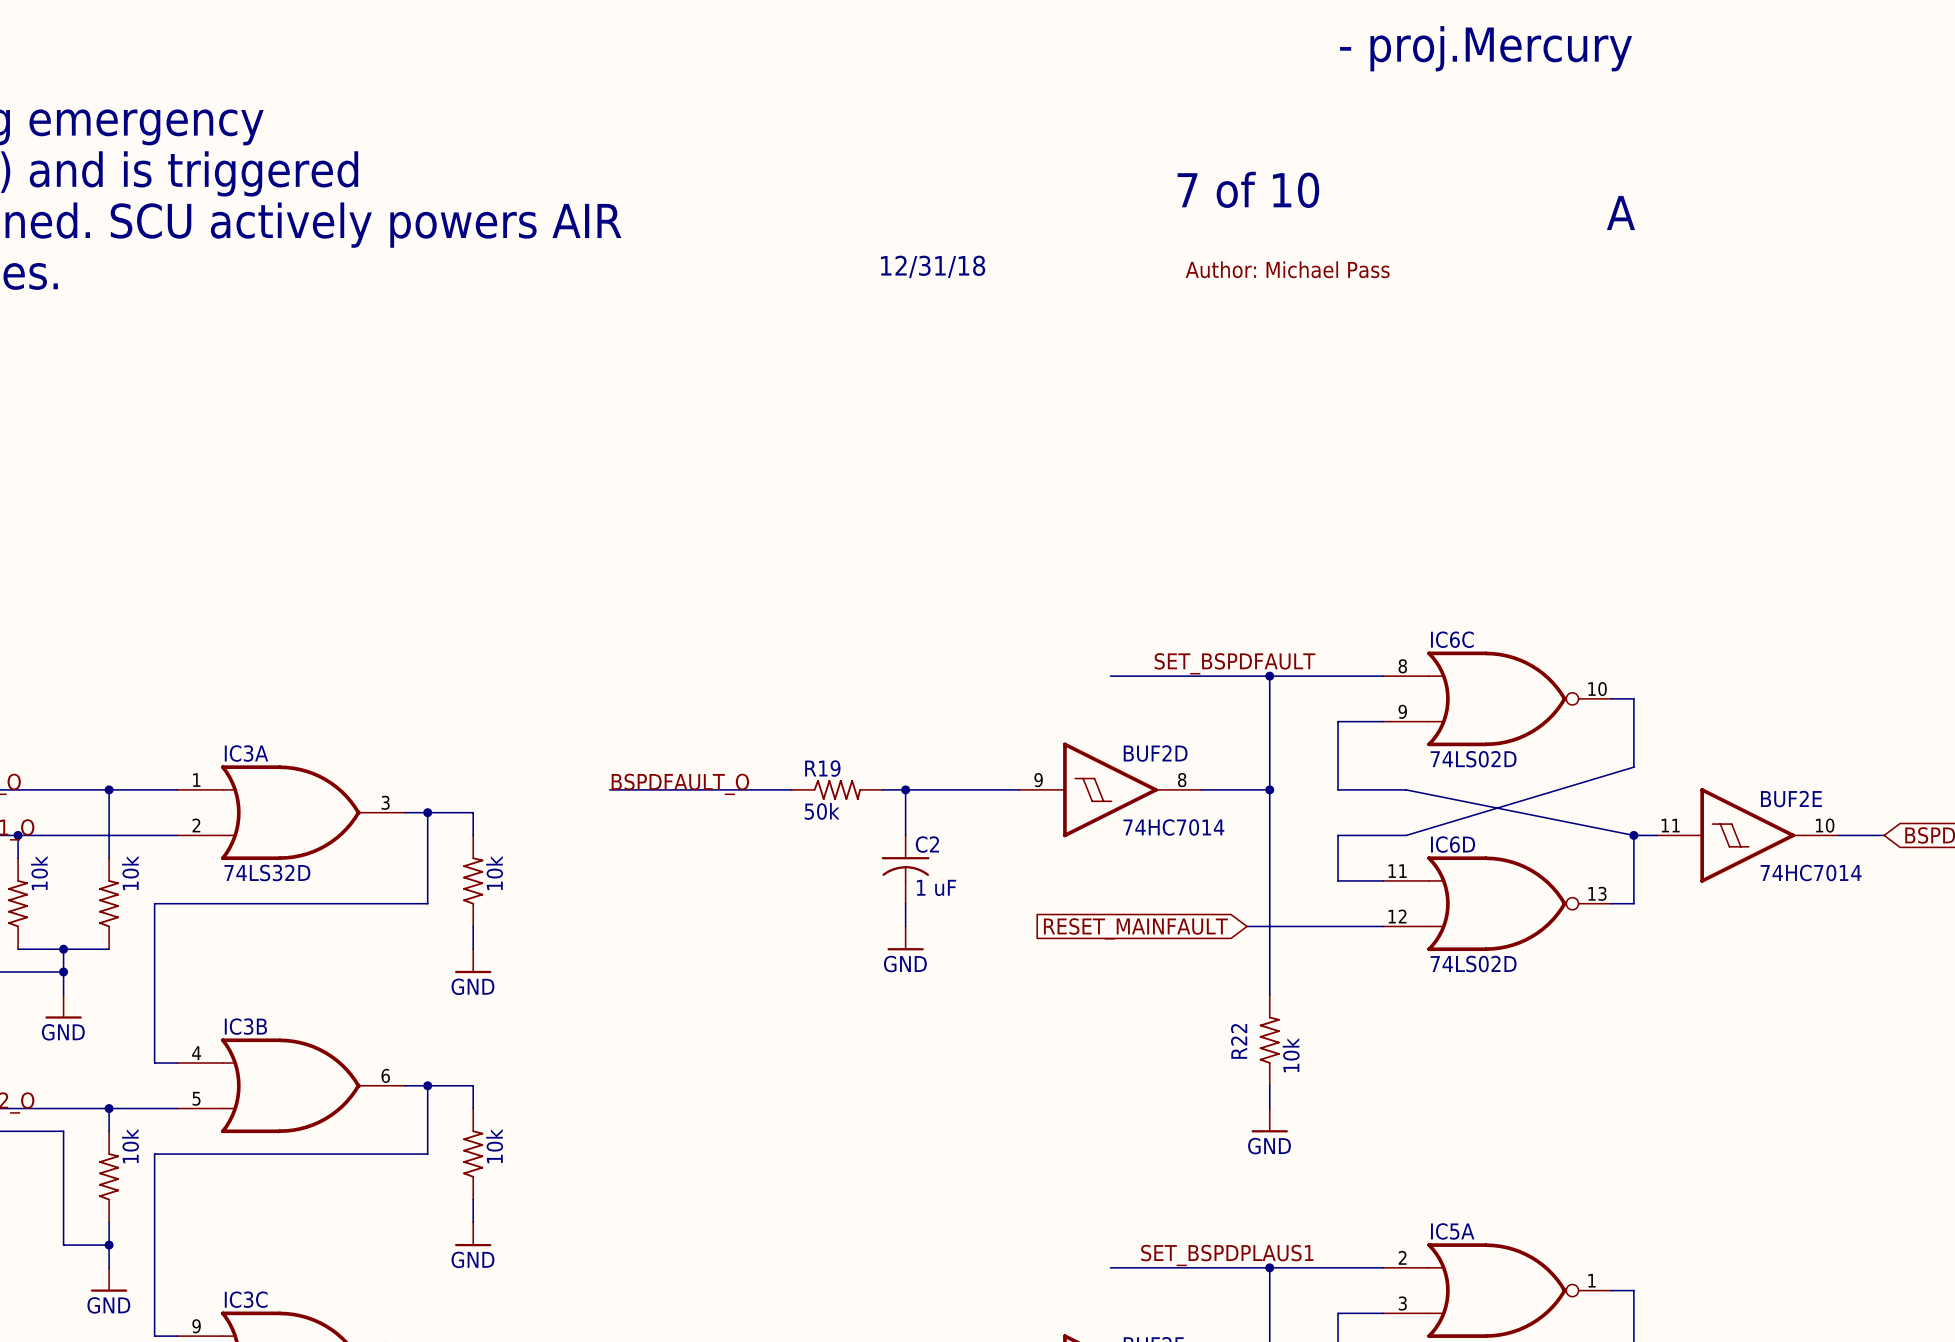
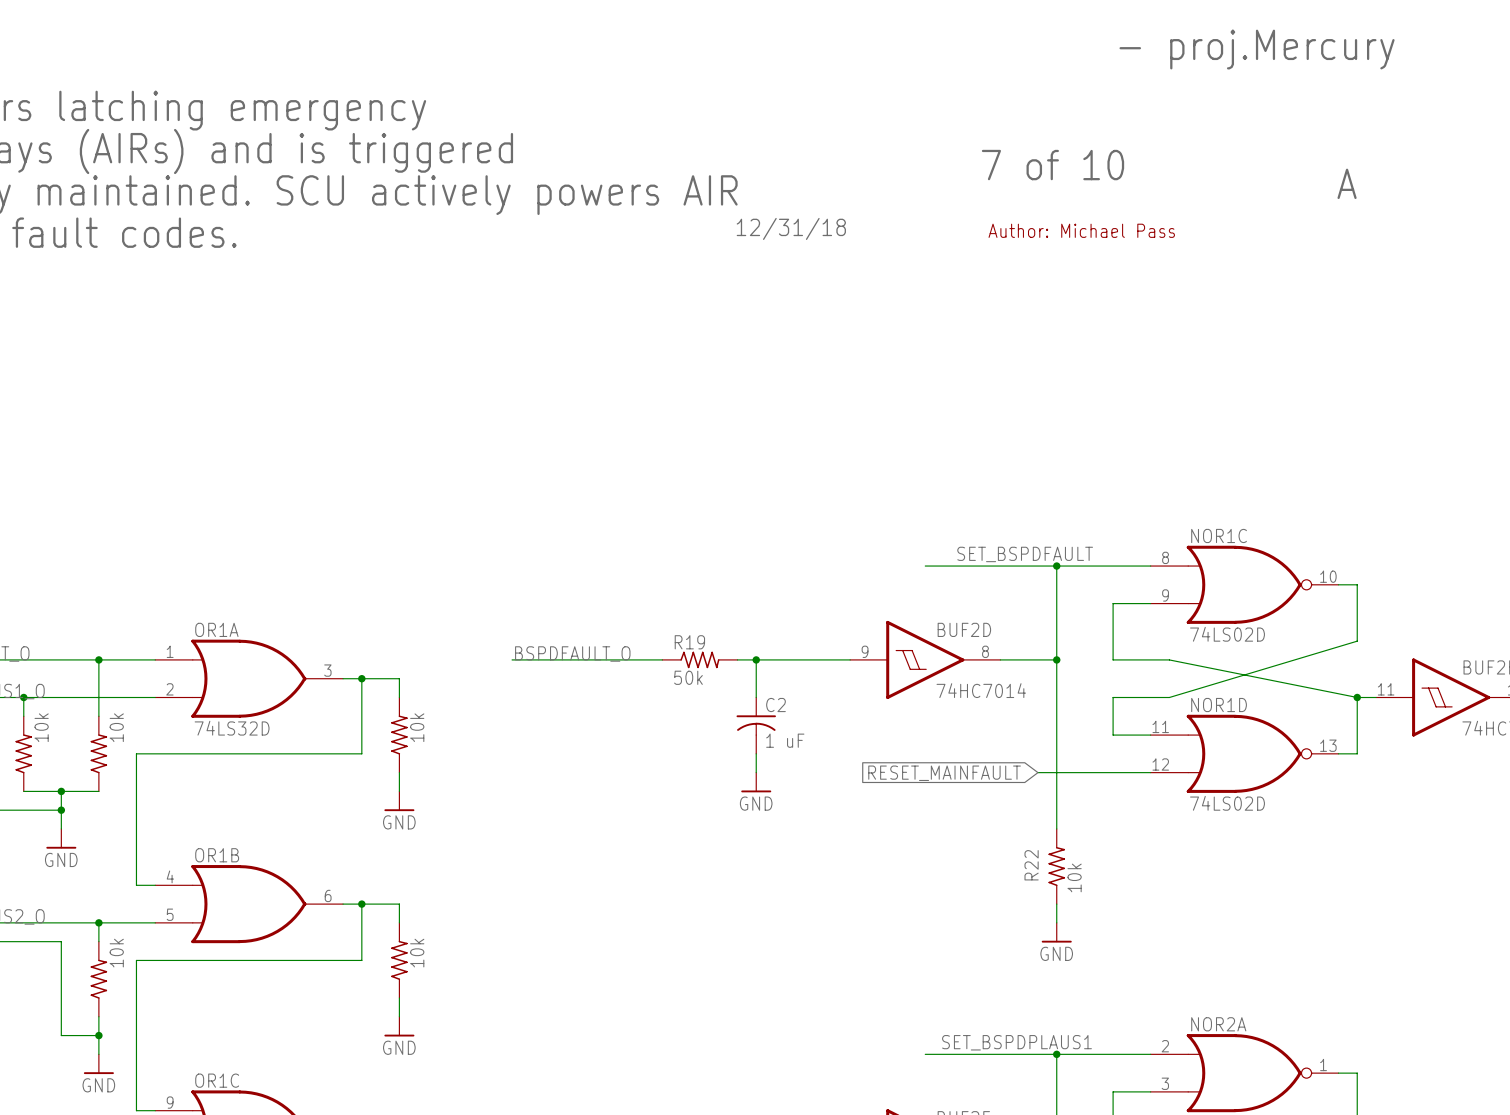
IC6C name: IC6C (1452, 639) -> NOR1C (1219, 535)
IC3A name: IC3A (246, 753) -> OR1A (216, 629)
IC6D name: IC6D (1453, 844) -> NOR1D (1219, 705)
IC3B name: IC3B (245, 1026) -> OR1B (217, 855)
IC5A name: IC5A (1452, 1231) -> NOR2A (1218, 1024)
IC3C name: IC3C (246, 1299) -> OR1C (217, 1080)

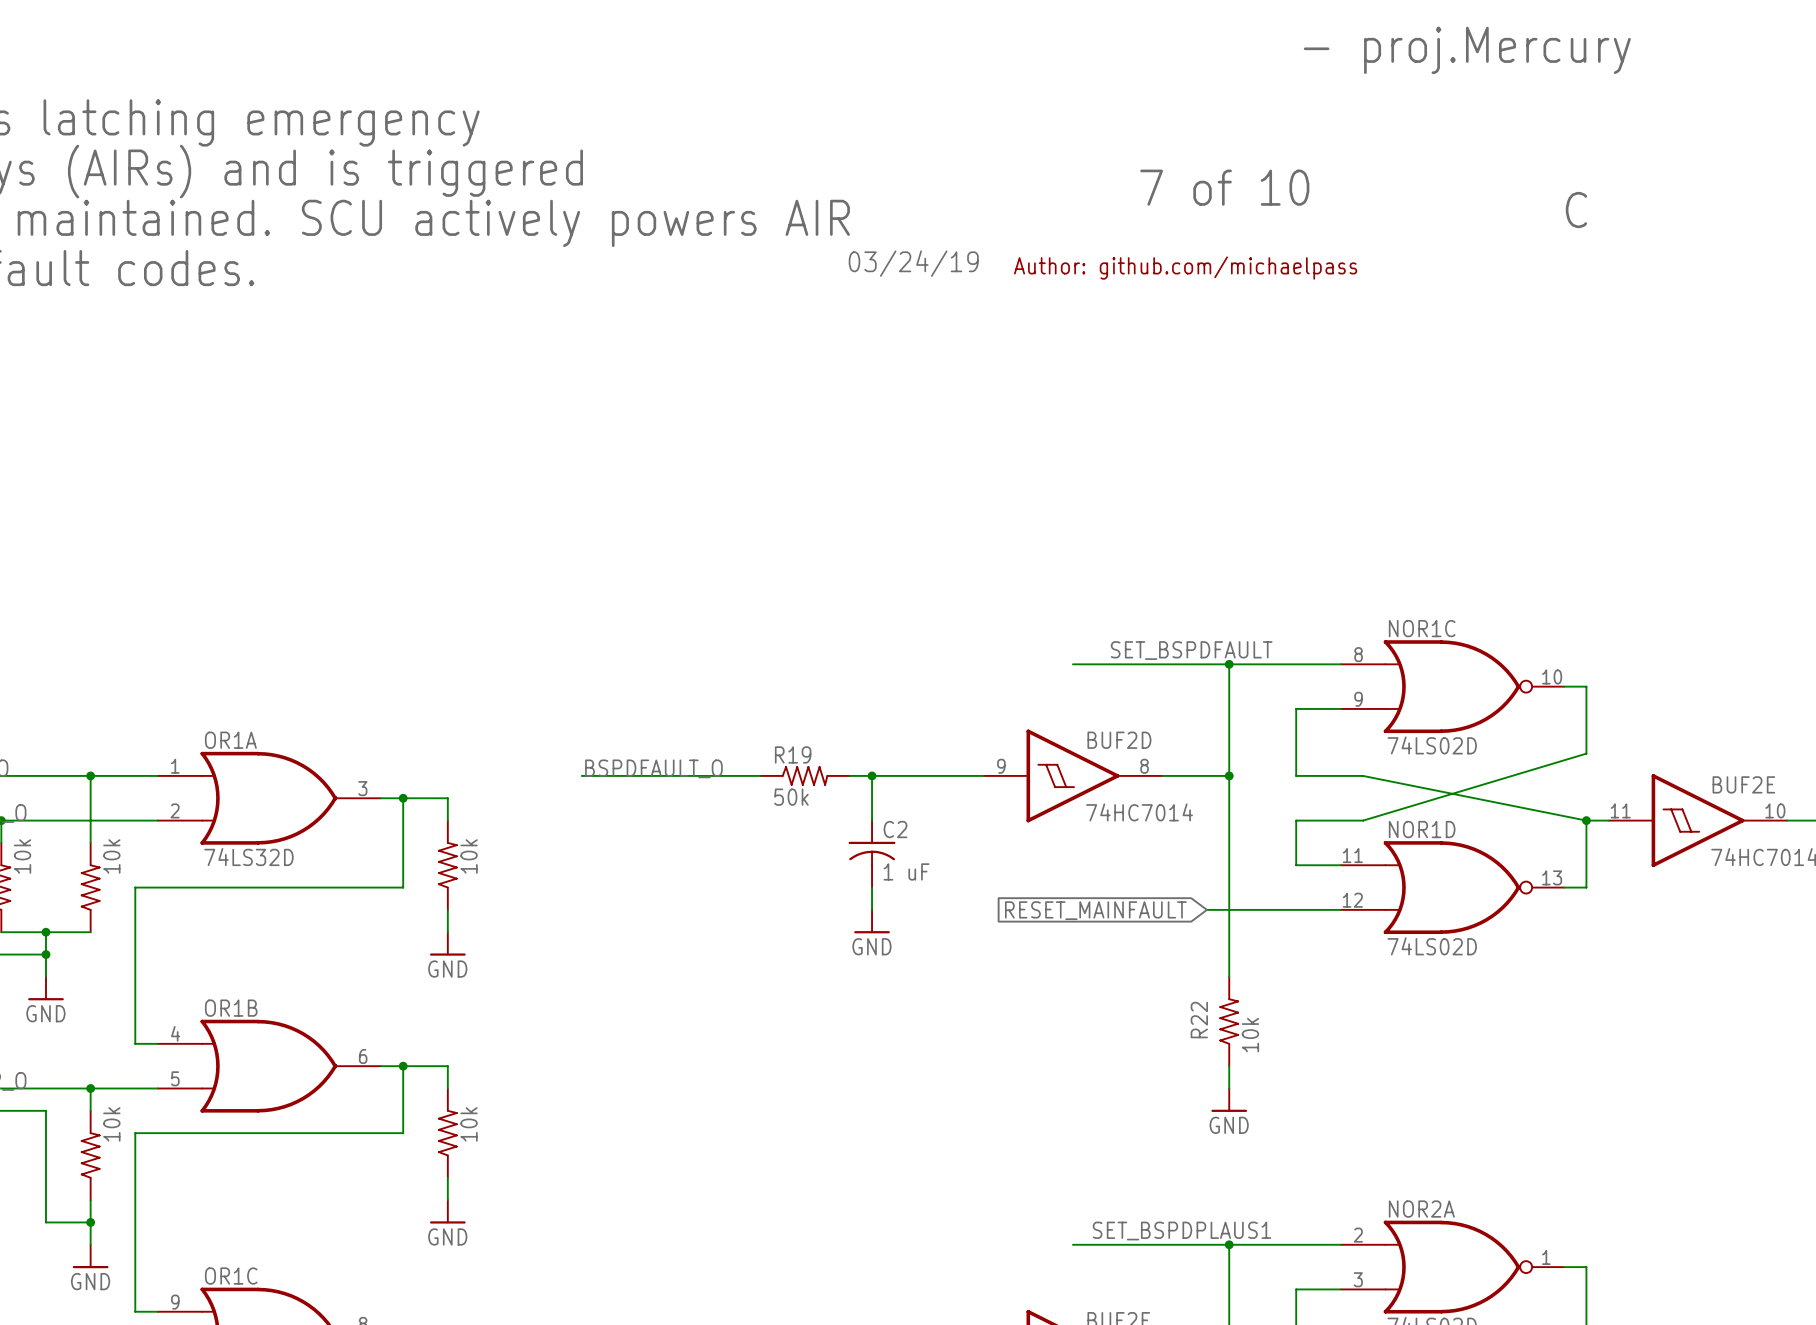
text: A (1347, 183) -> C (1576, 210)
text: 12/31/18 (791, 228) -> 03/24/19 (913, 263)
text: Author: Michael Pass (1081, 230) -> Author: github.com/michaelpass (1185, 268)

